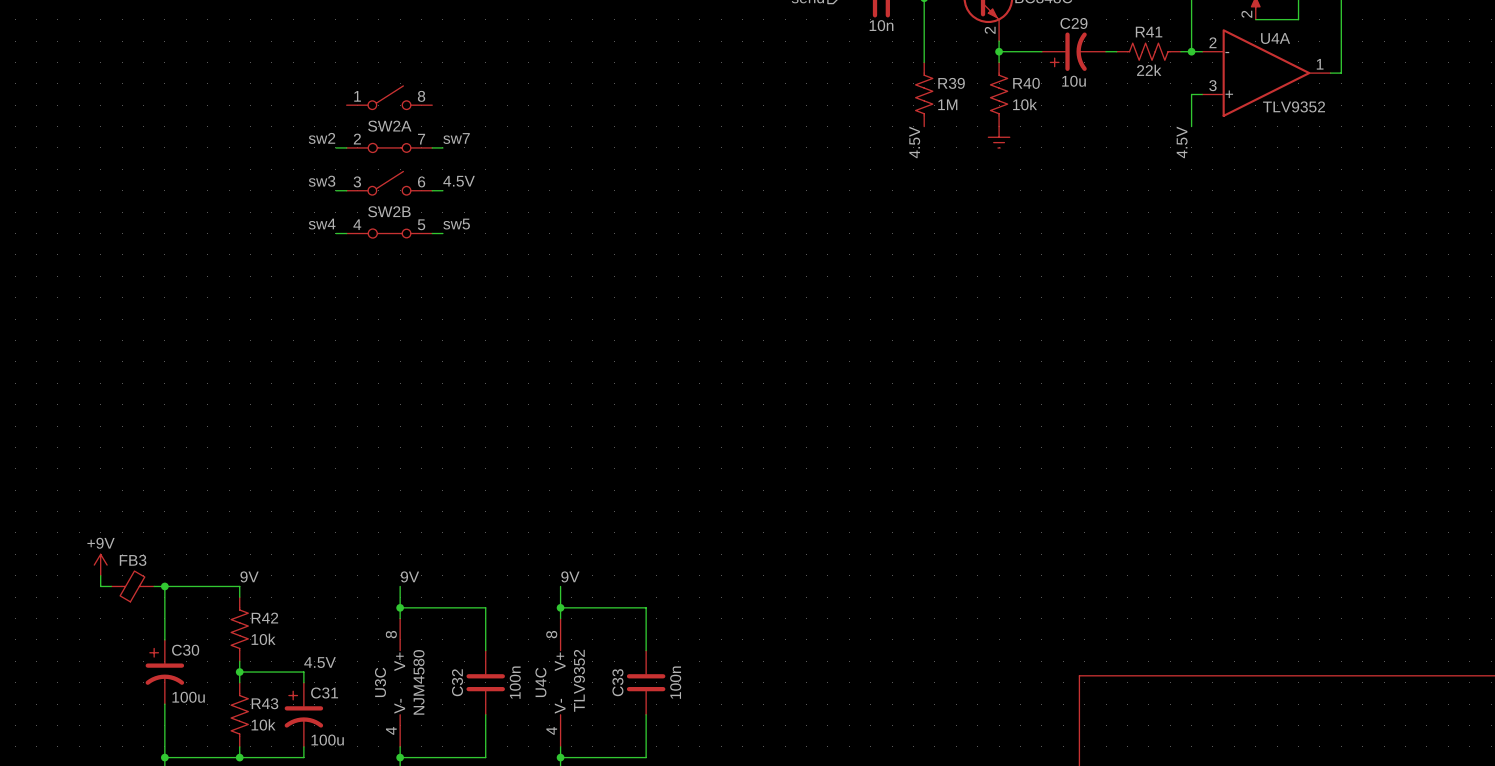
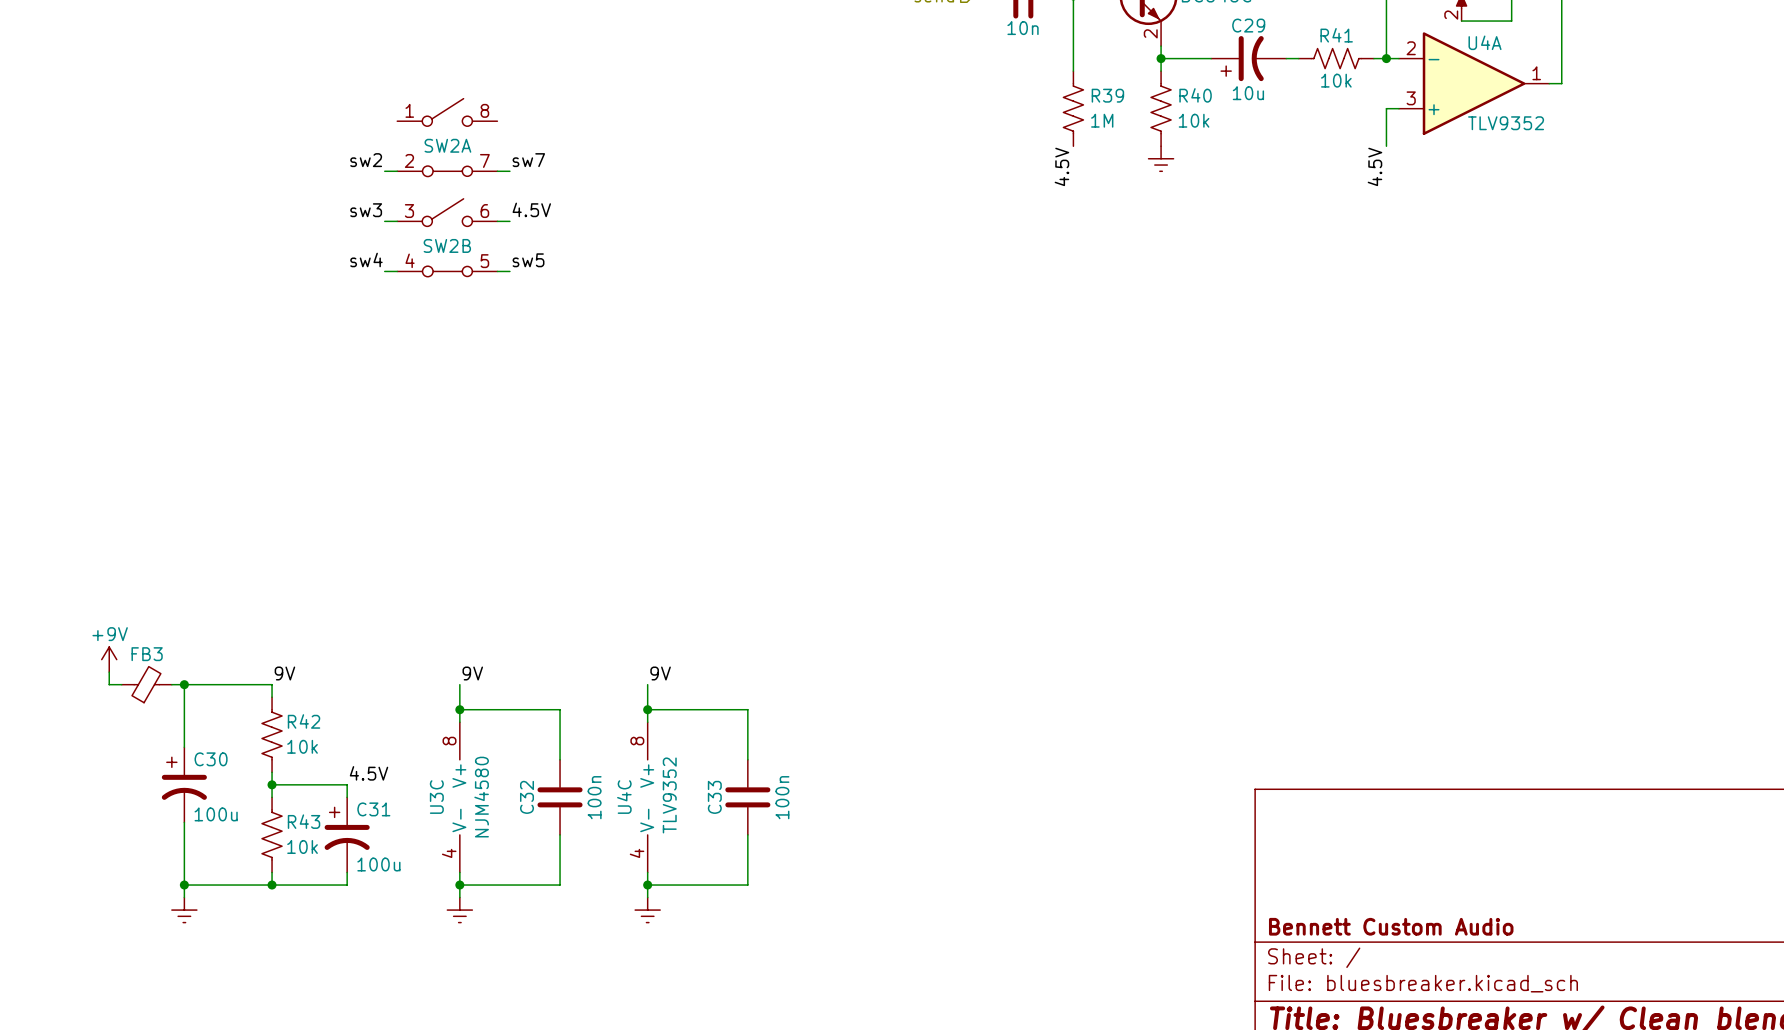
R41 value: 22k (1149, 70) -> 10k (1336, 80)

